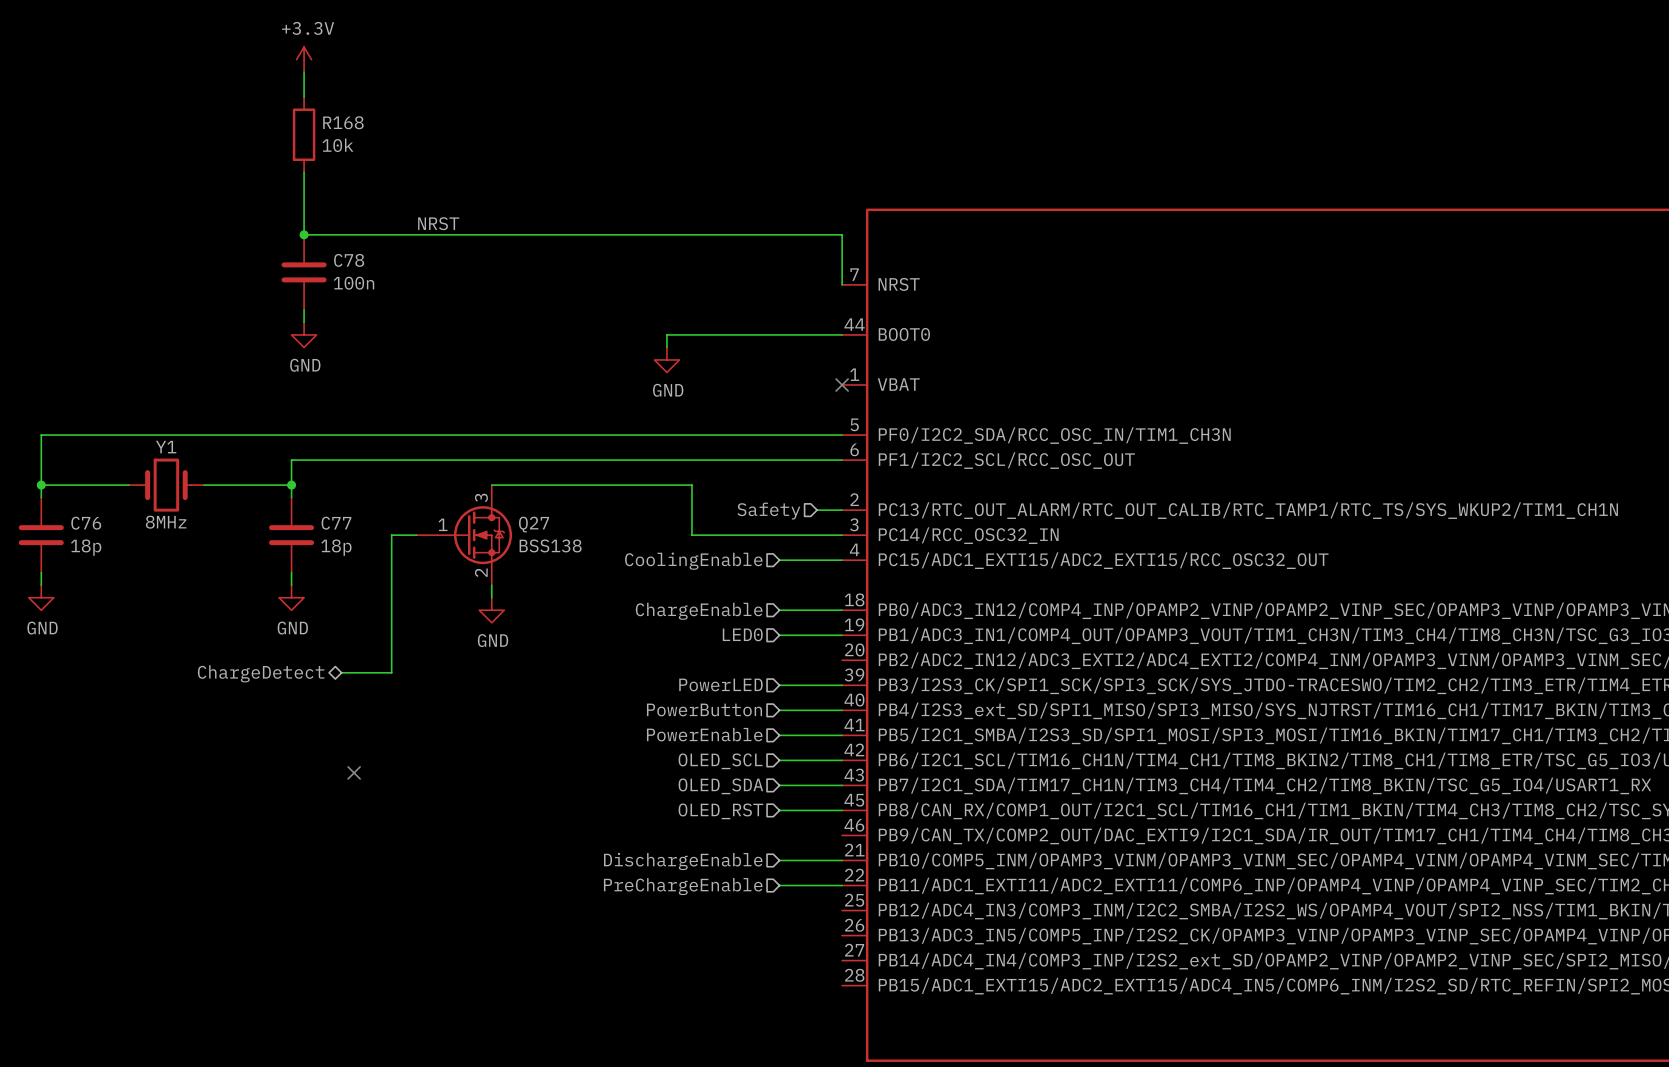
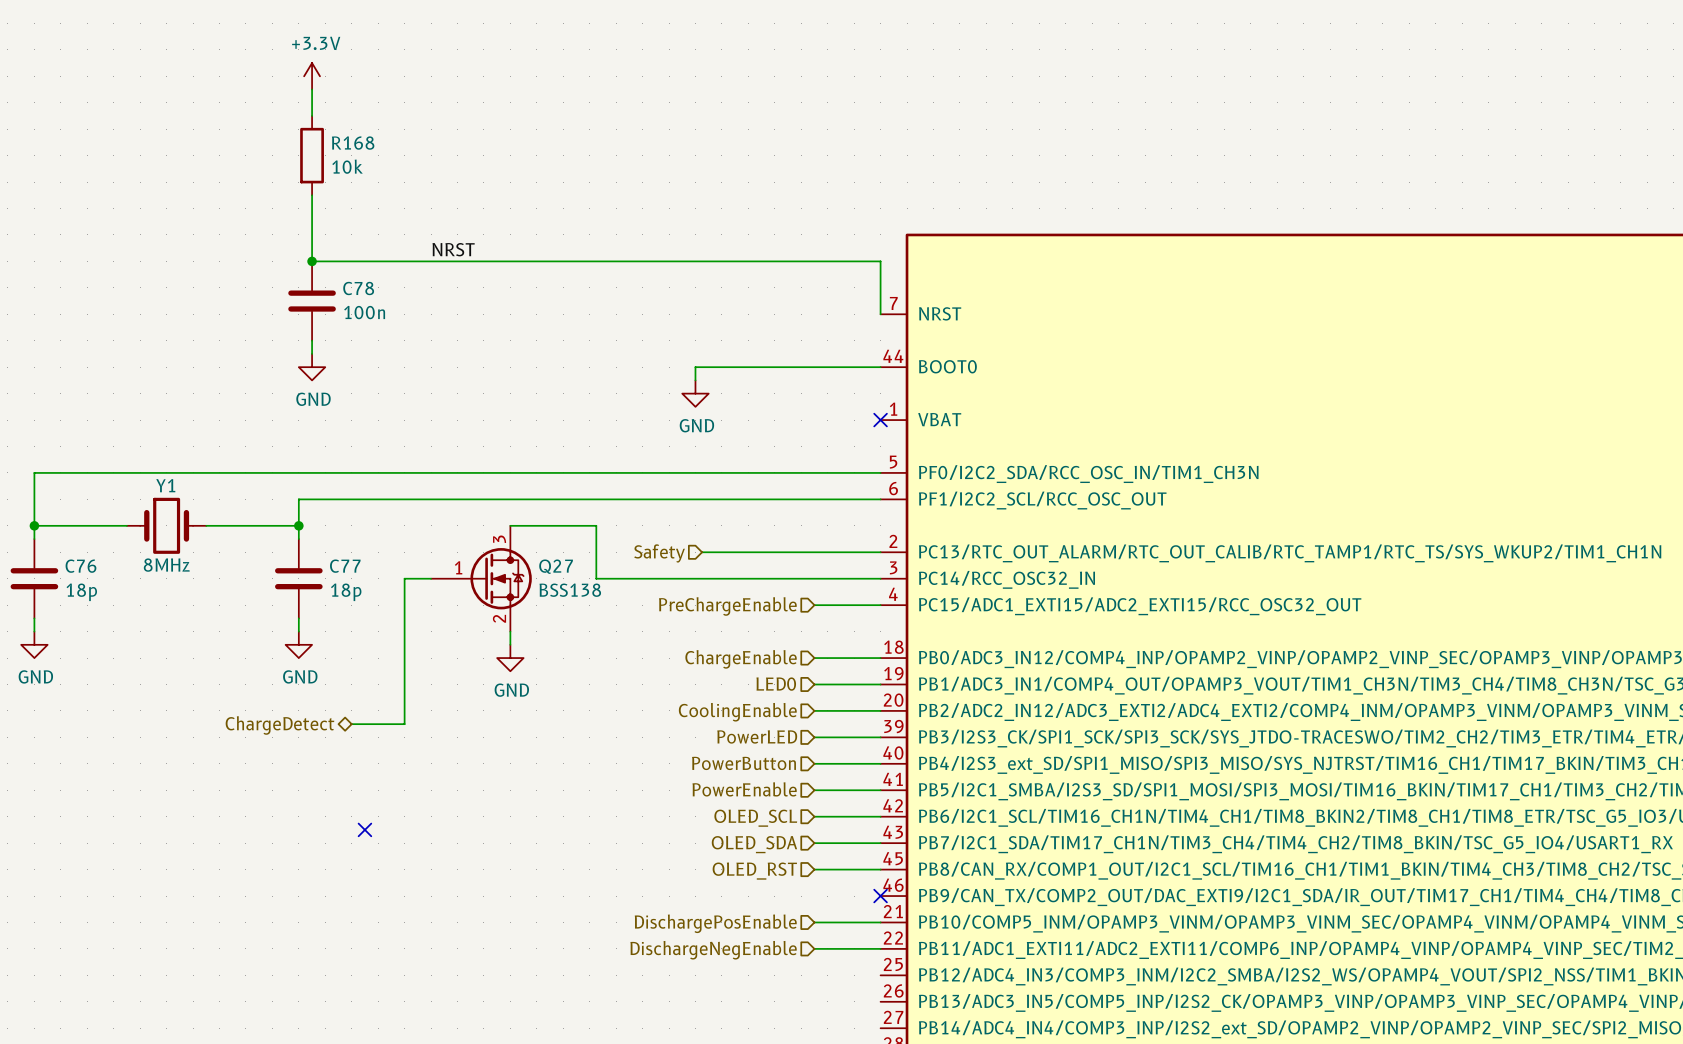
wire: (573, 485) (691, 485) (691, 535) -> (596, 525) (596, 578) (721, 578)
wire: none -> (702, 552) (854, 552)
hierarchical label position: Safety (768, 511) -> Safety (659, 553)
hierarchical label: CoolingEnable (693, 561) -> PreChargeEnable (727, 606)
wire: none -> (814, 710) (880, 710)
hierarchical label: none -> CoolingEnable (737, 712)
no-connect mark: none -> (880, 896)
hierarchical label: DischargeEnable (683, 861) -> DischargePosEnable (715, 923)
hierarchical label: PreChargeEnable (683, 886) -> DischargeNegEnable (713, 950)

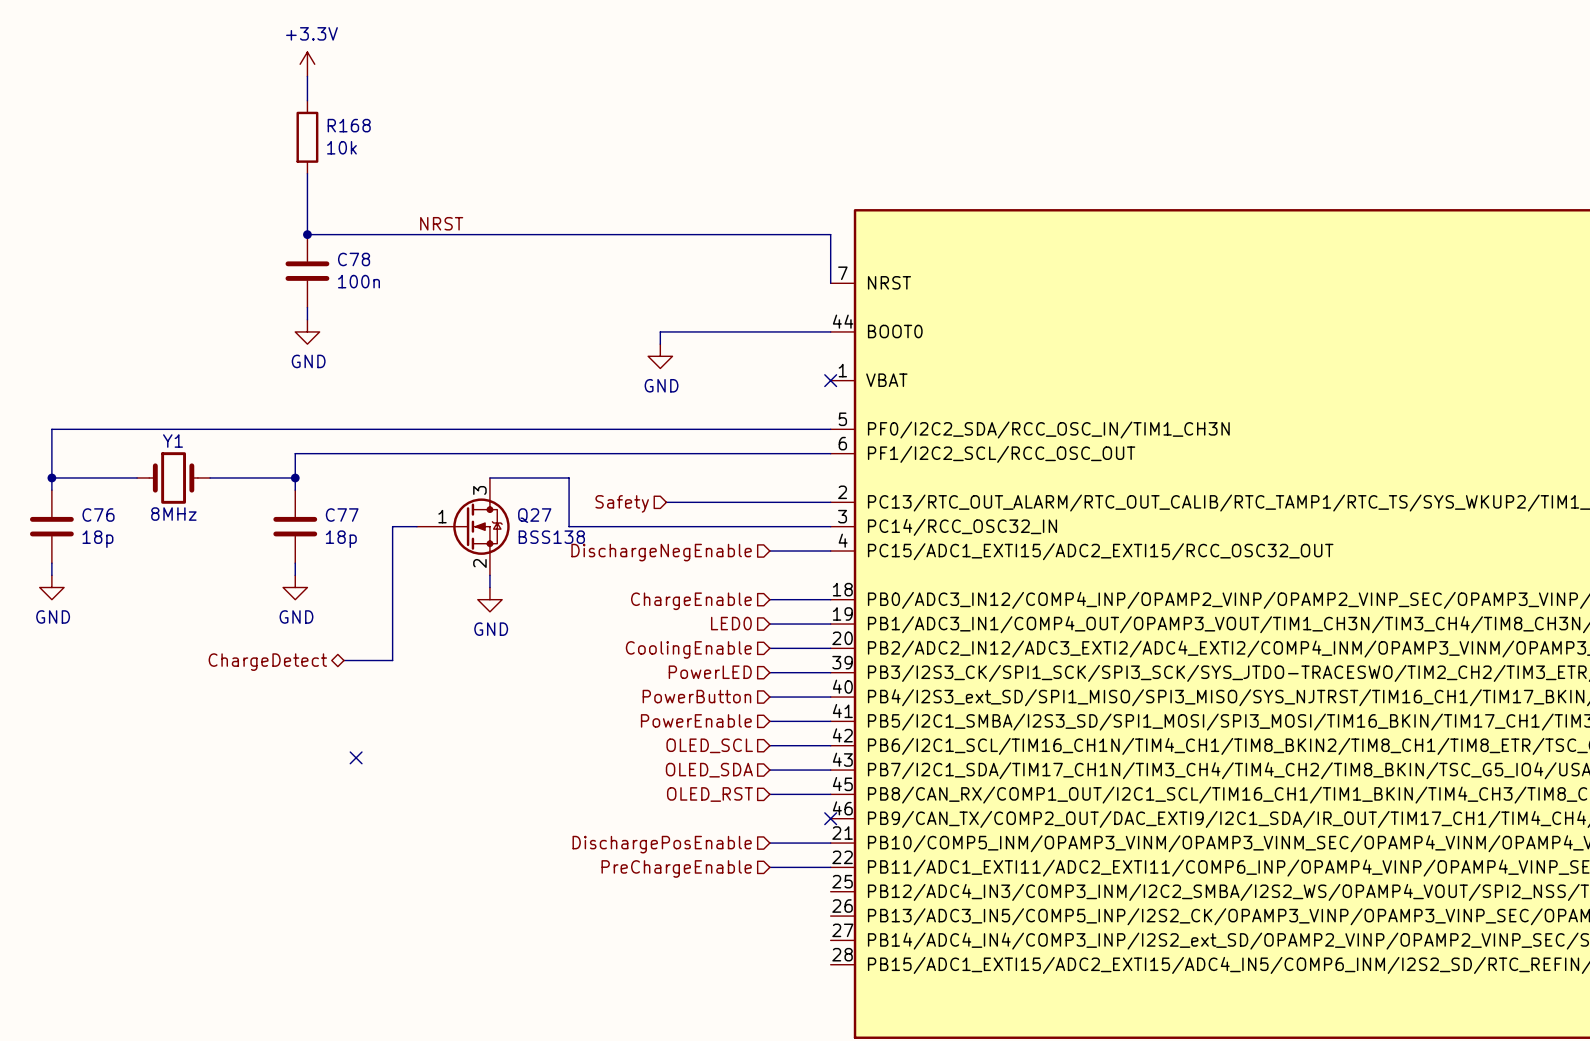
hierarchical label: PreChargeEnable (727, 606) -> DischargeNegEnable (661, 552)
hierarchical label: DischargeNegEnable (713, 950) -> PreChargeEnable (676, 868)

